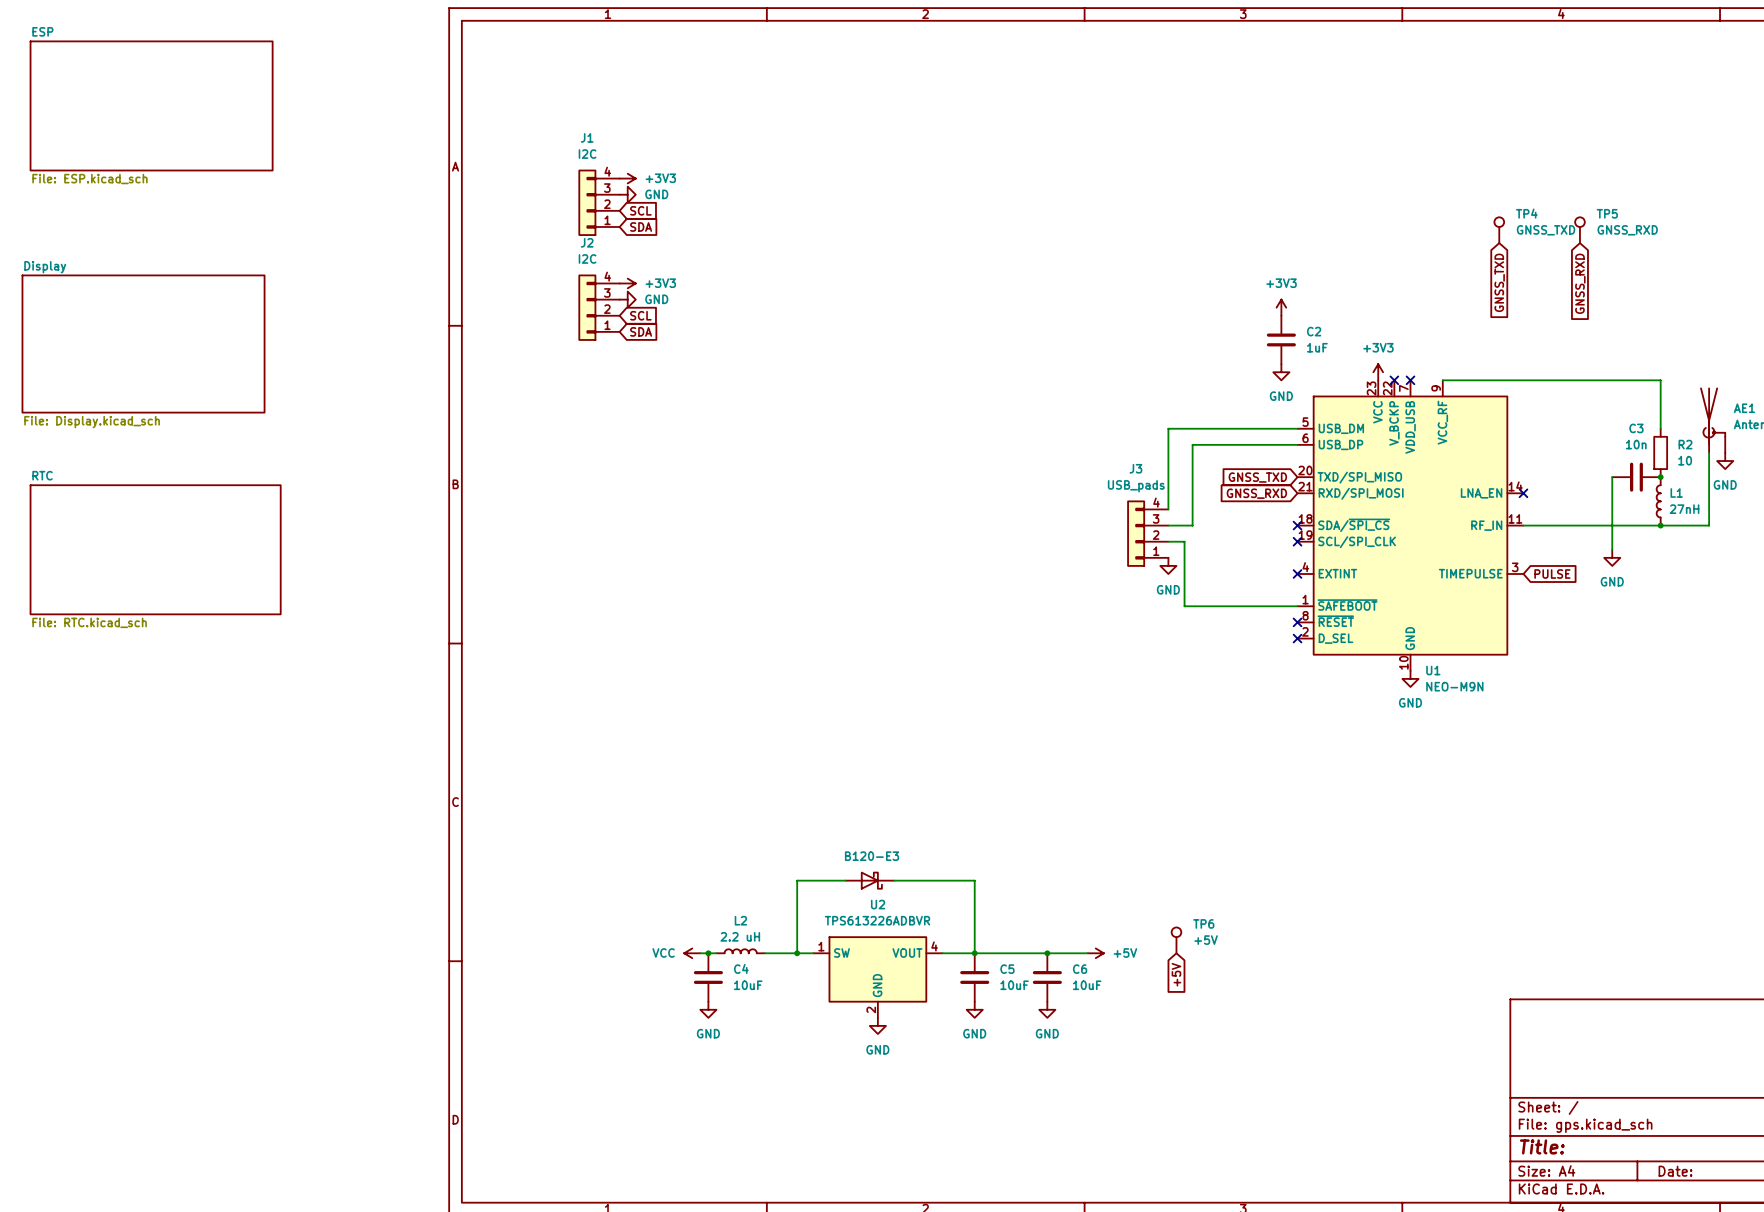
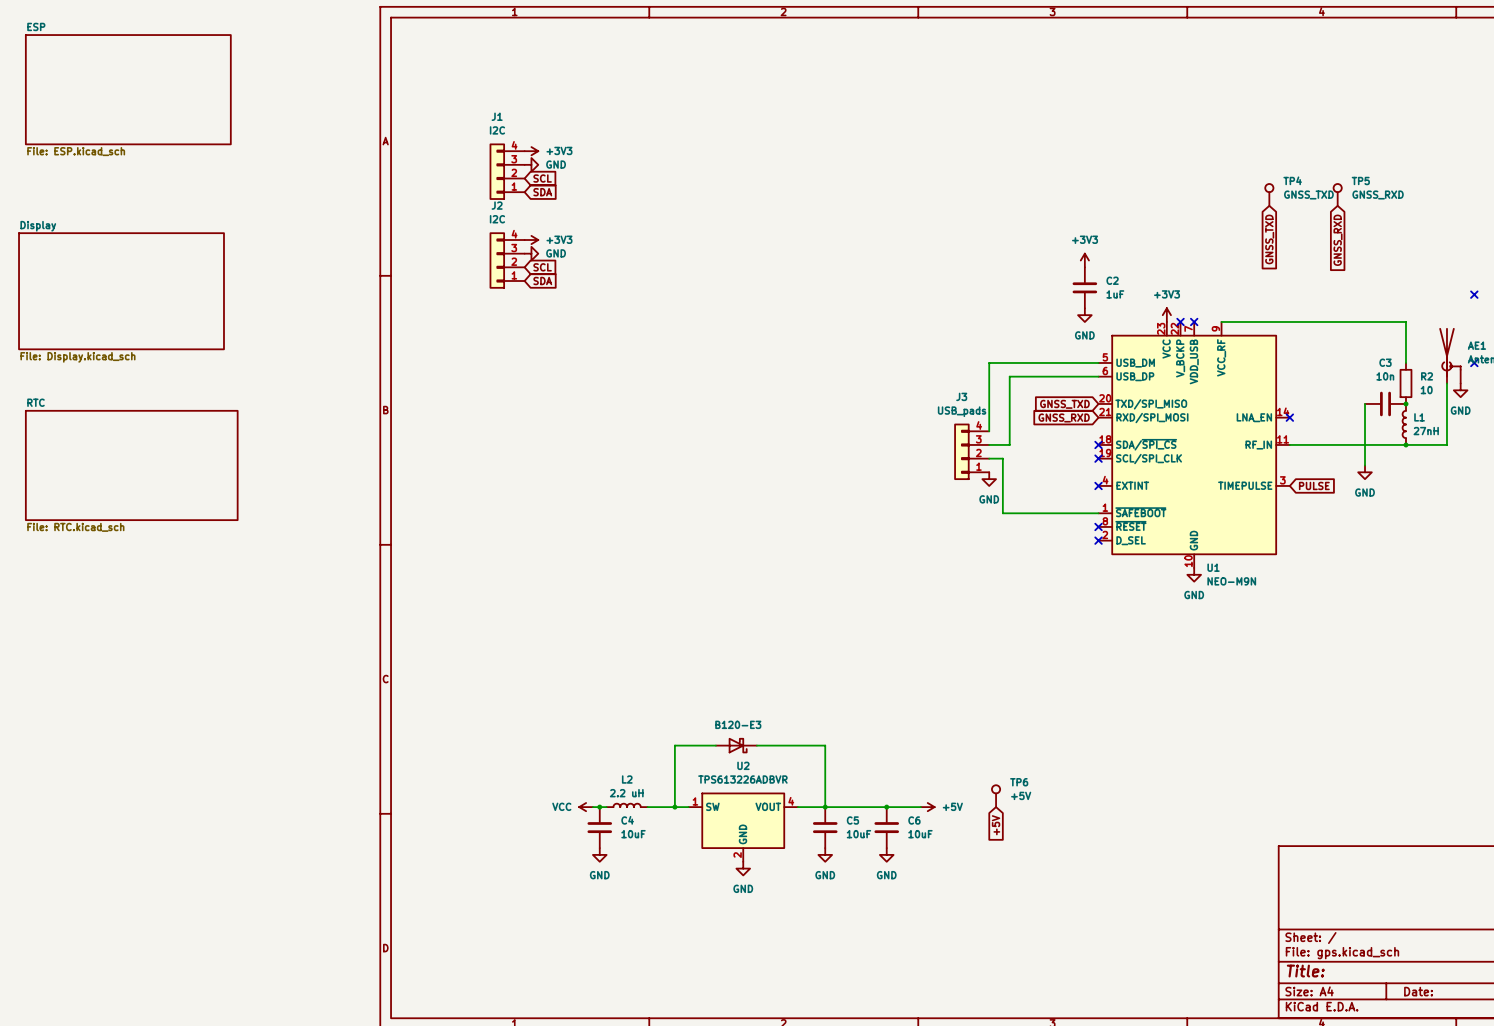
no-connect mark: none -> (1474, 294)
no-connect mark: none -> (1474, 362)

